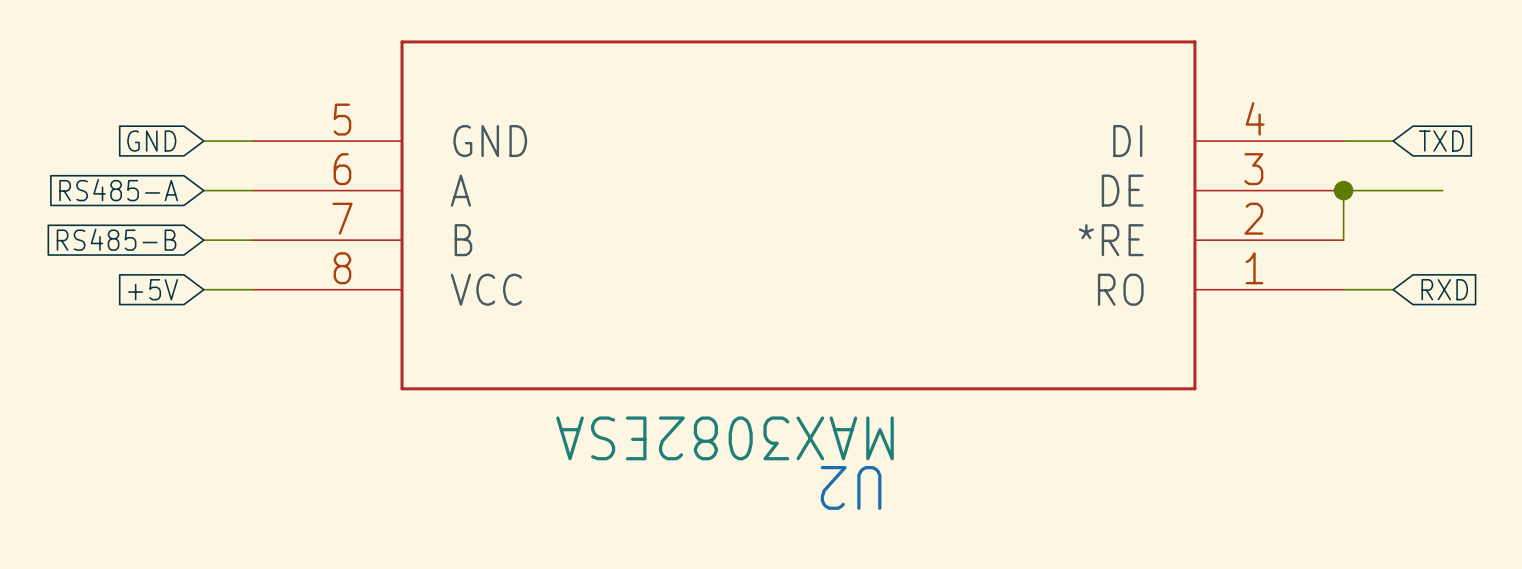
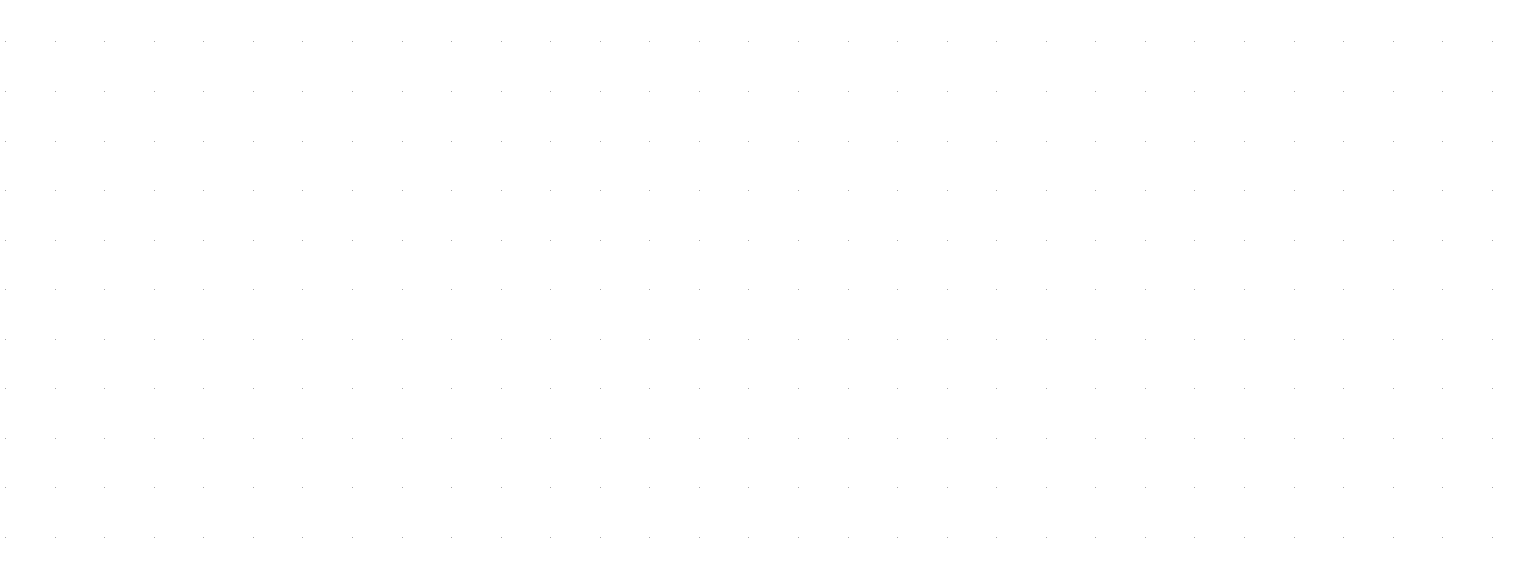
global label: GND (151, 141) -> none
wire: (203, 141) (253, 141) -> none
wire: (1343, 141) (1393, 141) -> none
global label: TXD (1441, 141) -> none
global label: RS485-A (118, 190) -> none
wire: (203, 190) (253, 190) -> none
junction: (1343, 190) -> none
wire: (1442, 190) (1343, 190) (1343, 240) -> none
U2: MAX3082ESA (798, 215) -> none
global label: RS485-B (116, 239) -> none
wire: (203, 240) (253, 240) -> none
global label: +5V (153, 289) -> none
wire: (203, 289) (253, 289) -> none
wire: (1343, 289) (1393, 289) -> none
global label: RXD (1444, 289) -> none

